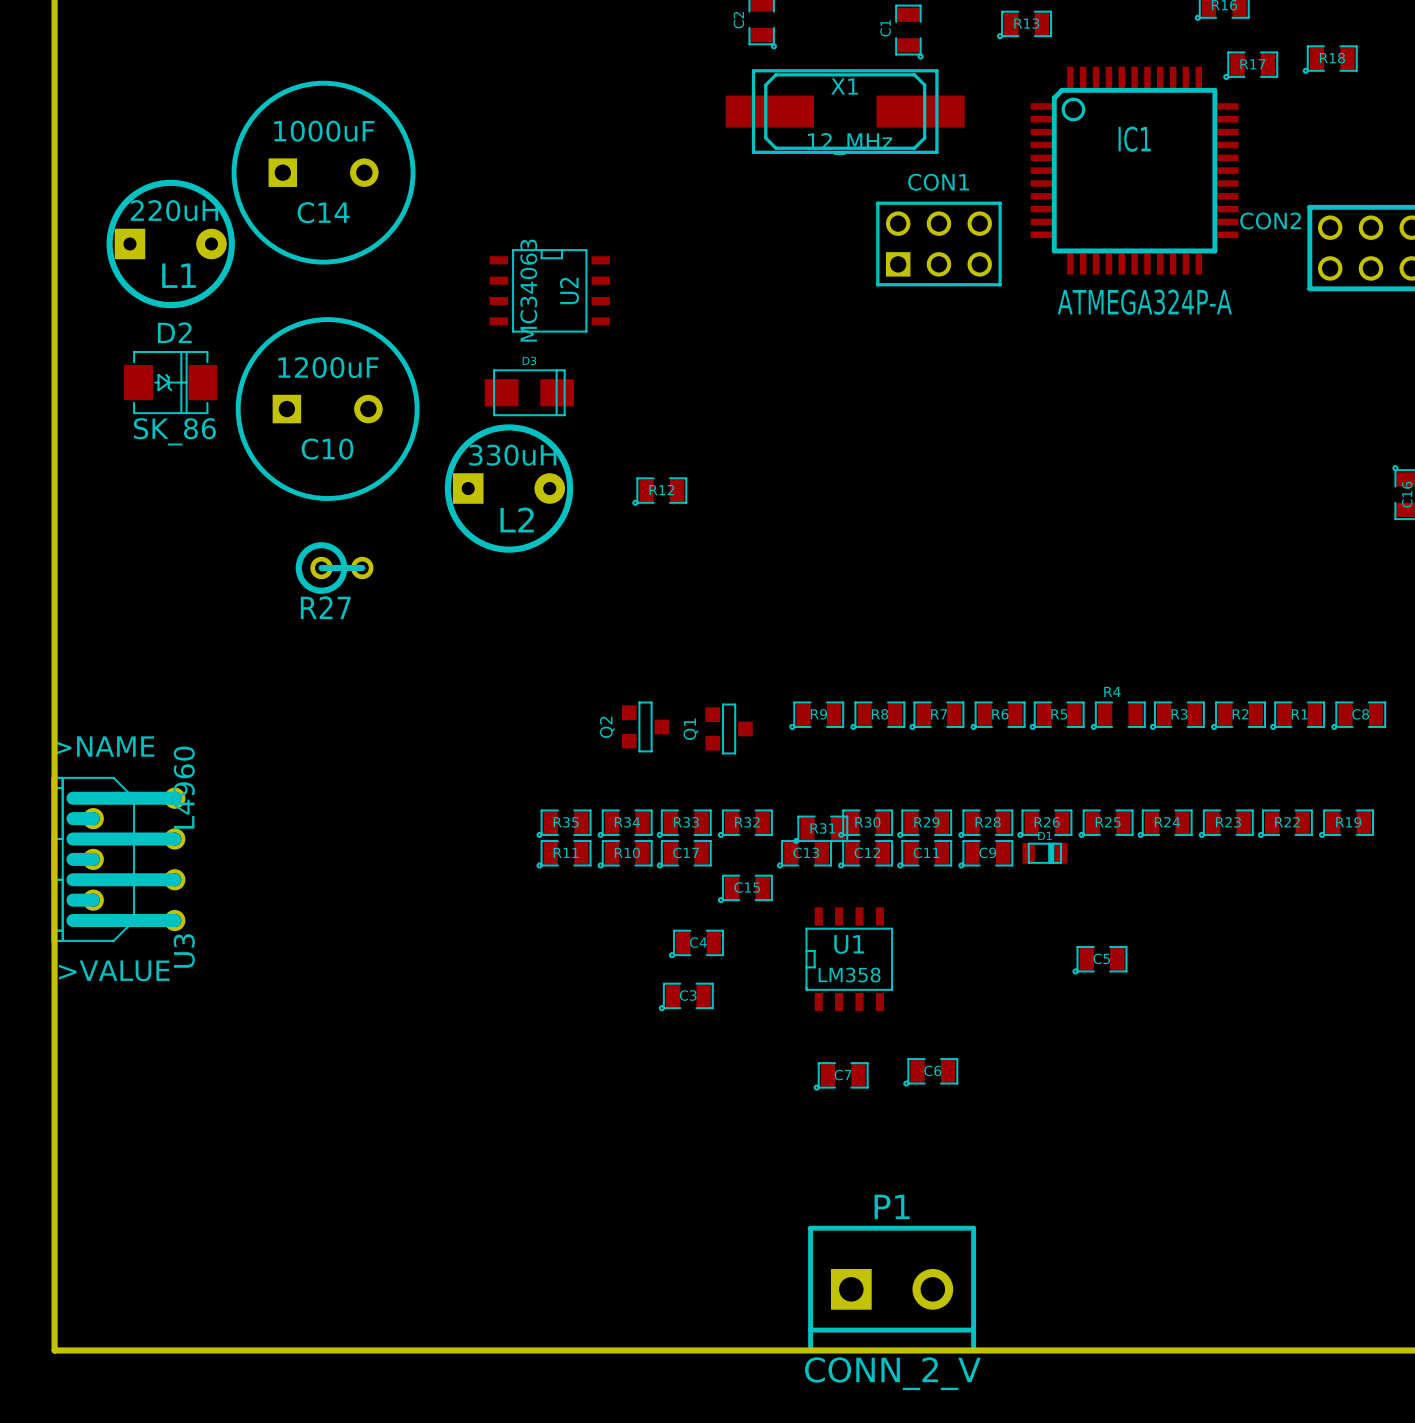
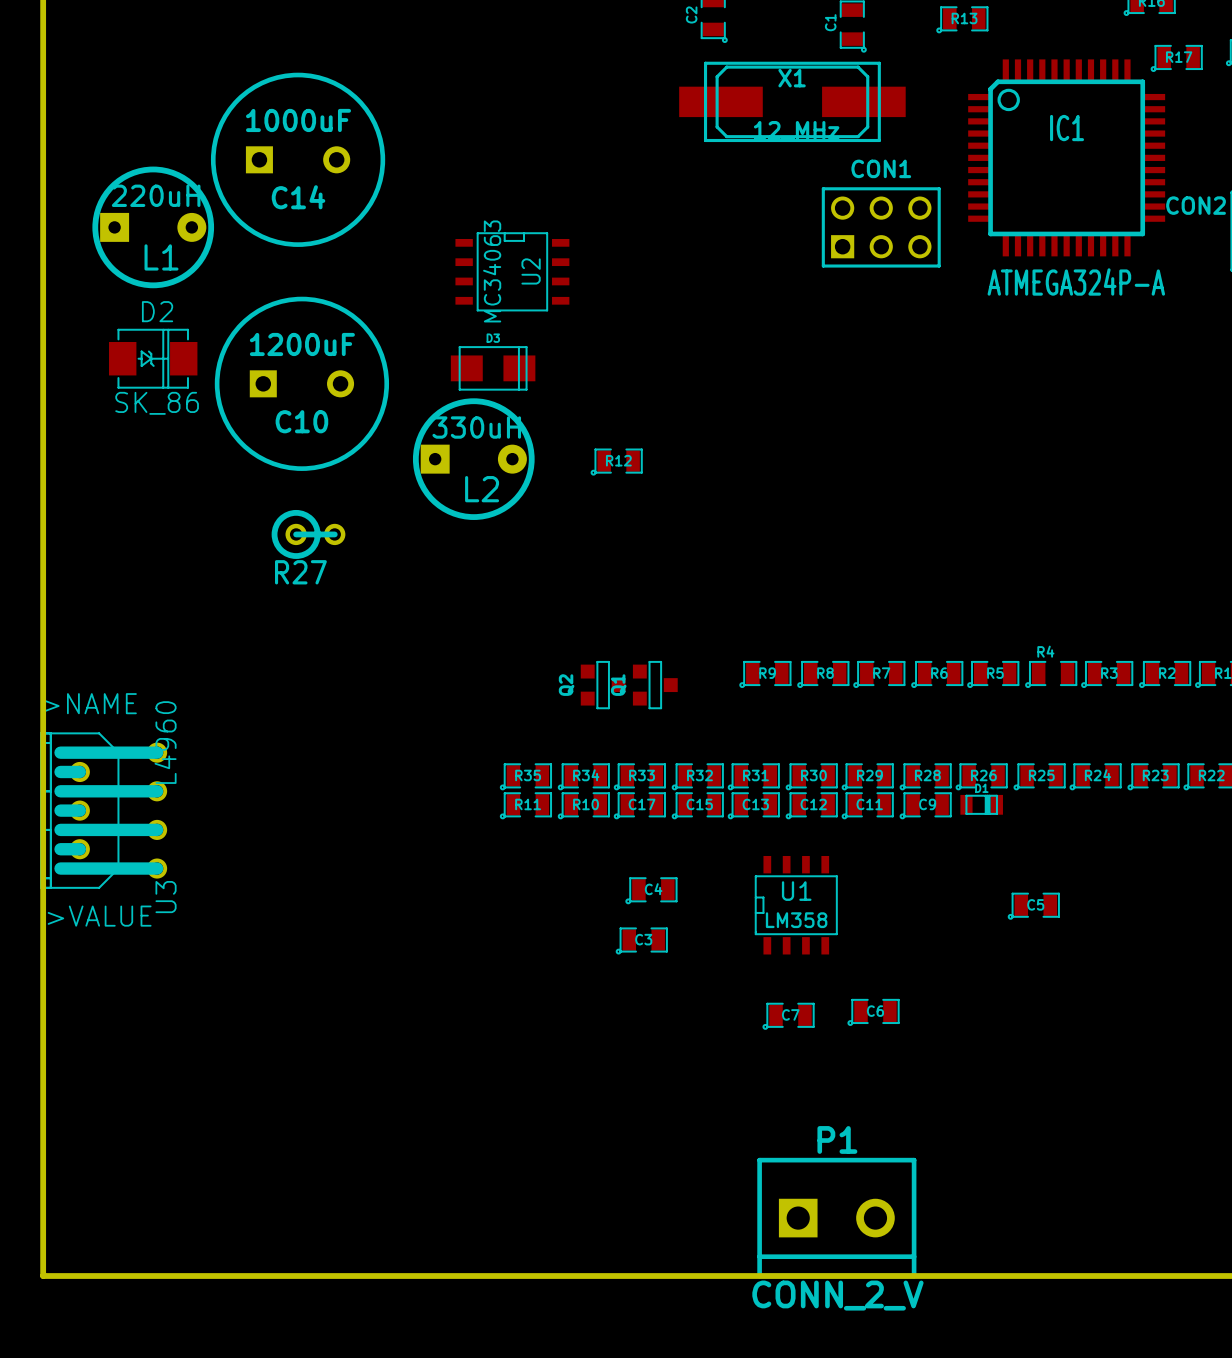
Q1 position: (729, 728) -> (655, 685)
R31 position: (820, 829) -> (753, 776)
C15 position: (745, 888) -> (697, 805)

